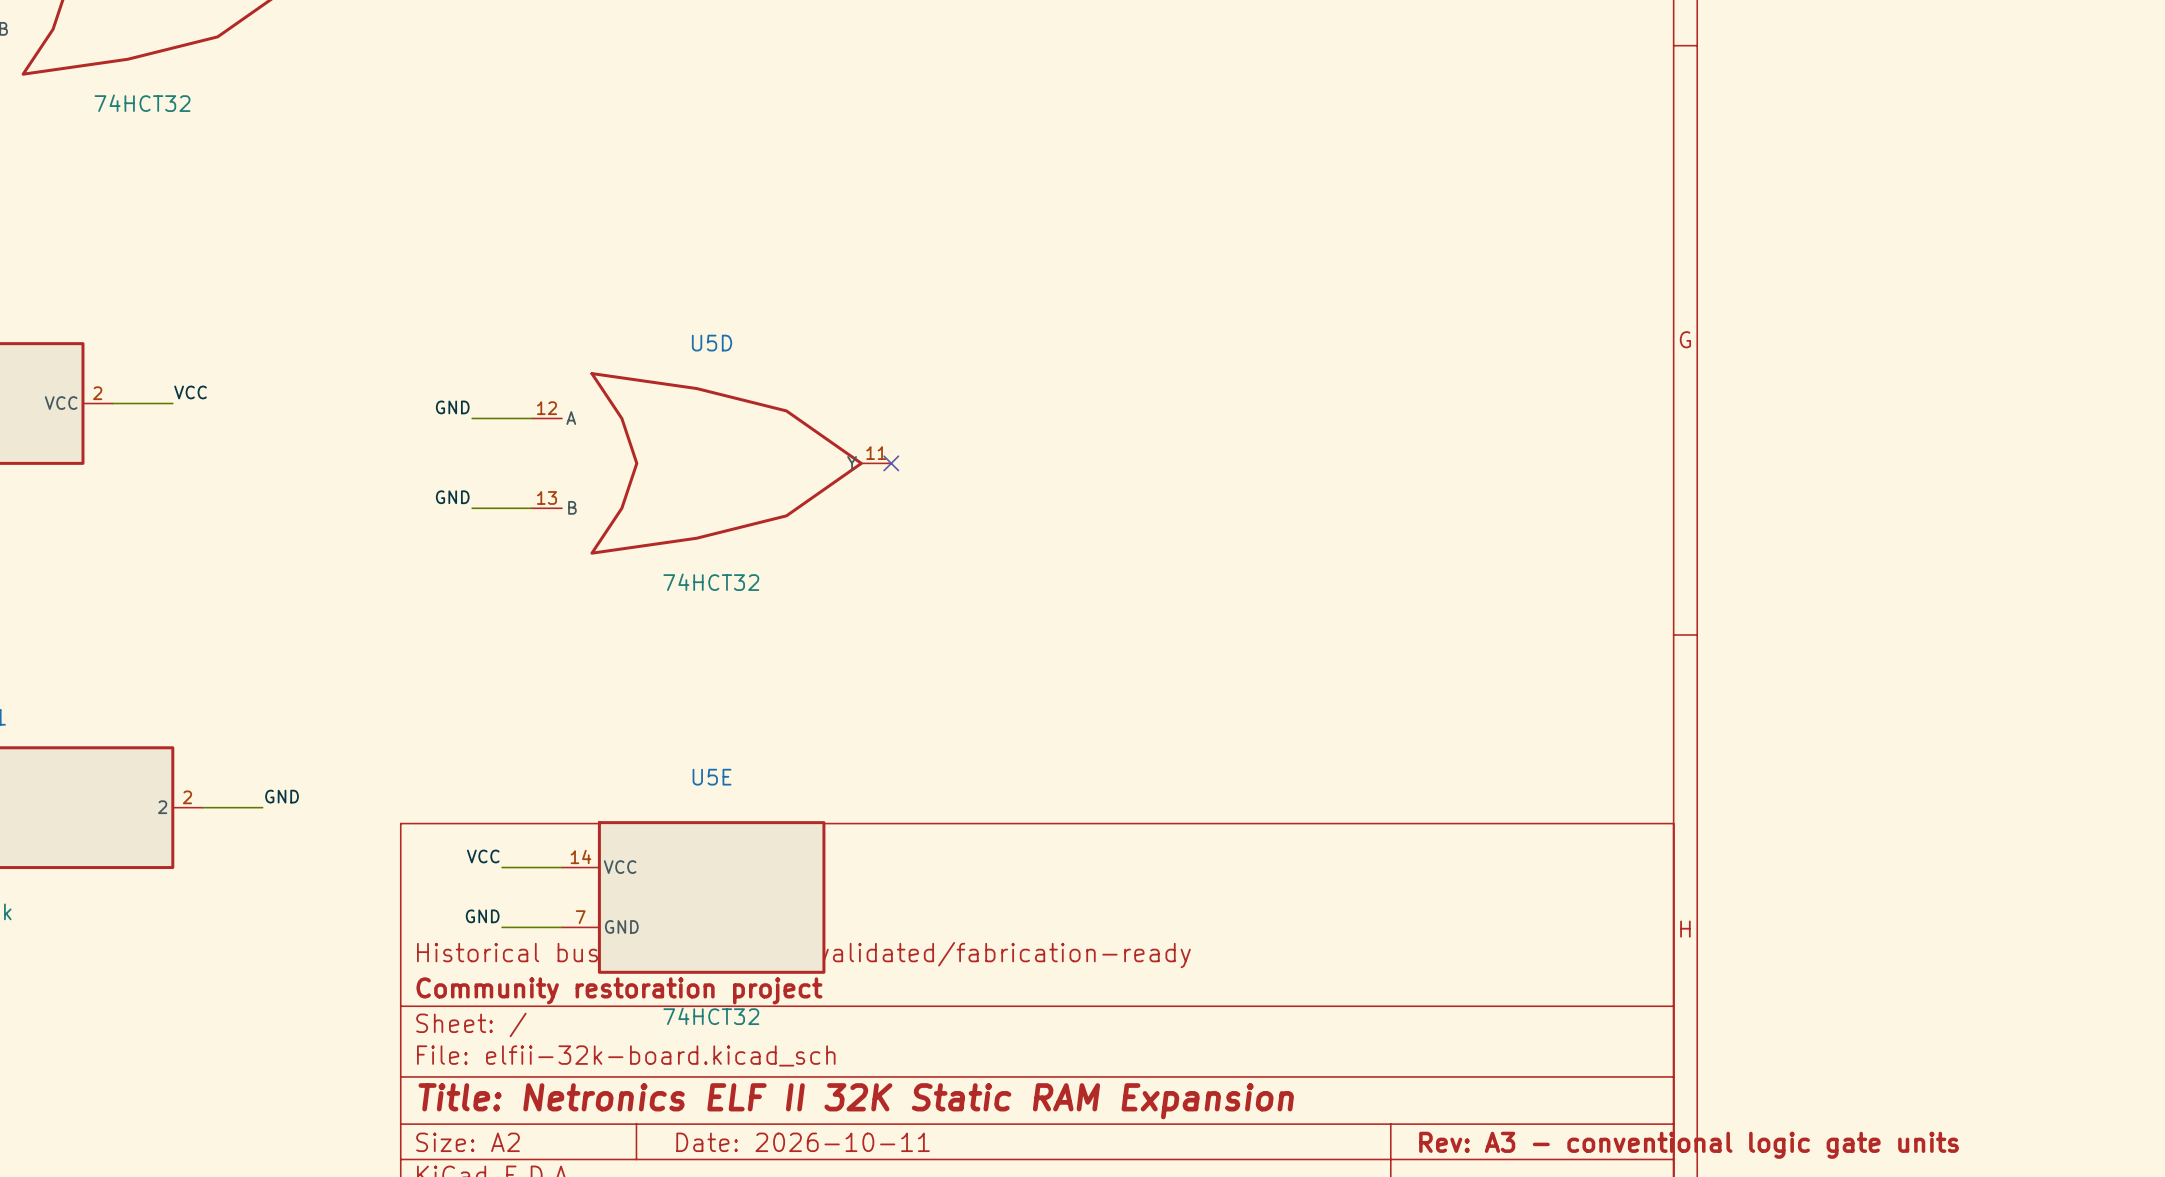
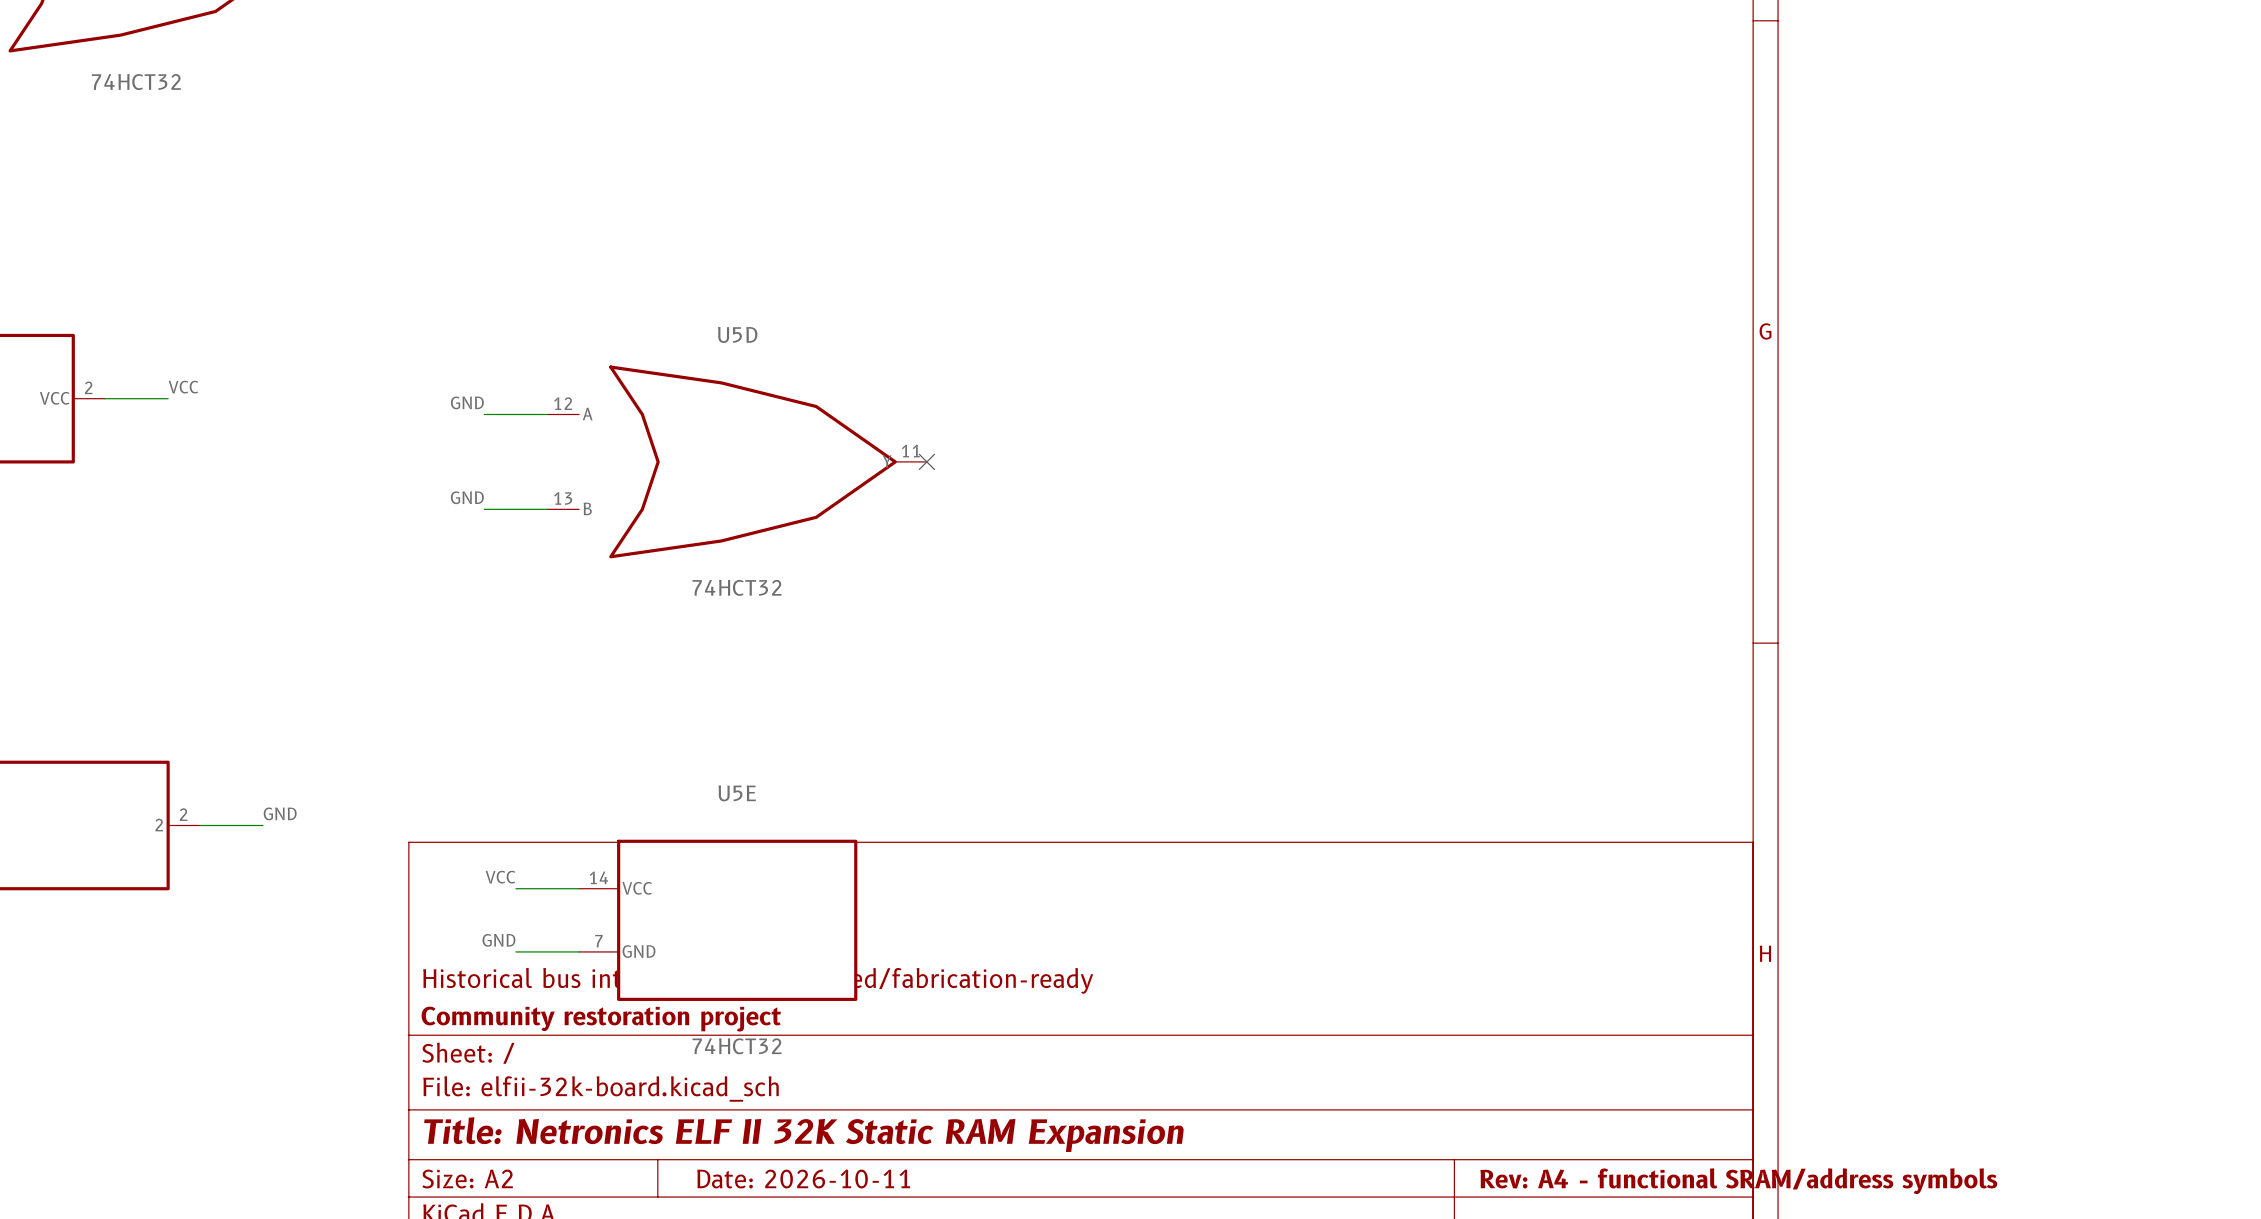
title block: Rev: A3 - conventional logic gate units (1689, 1145) -> Rev: A4 - functional SRAM/address symbols (1738, 1181)

